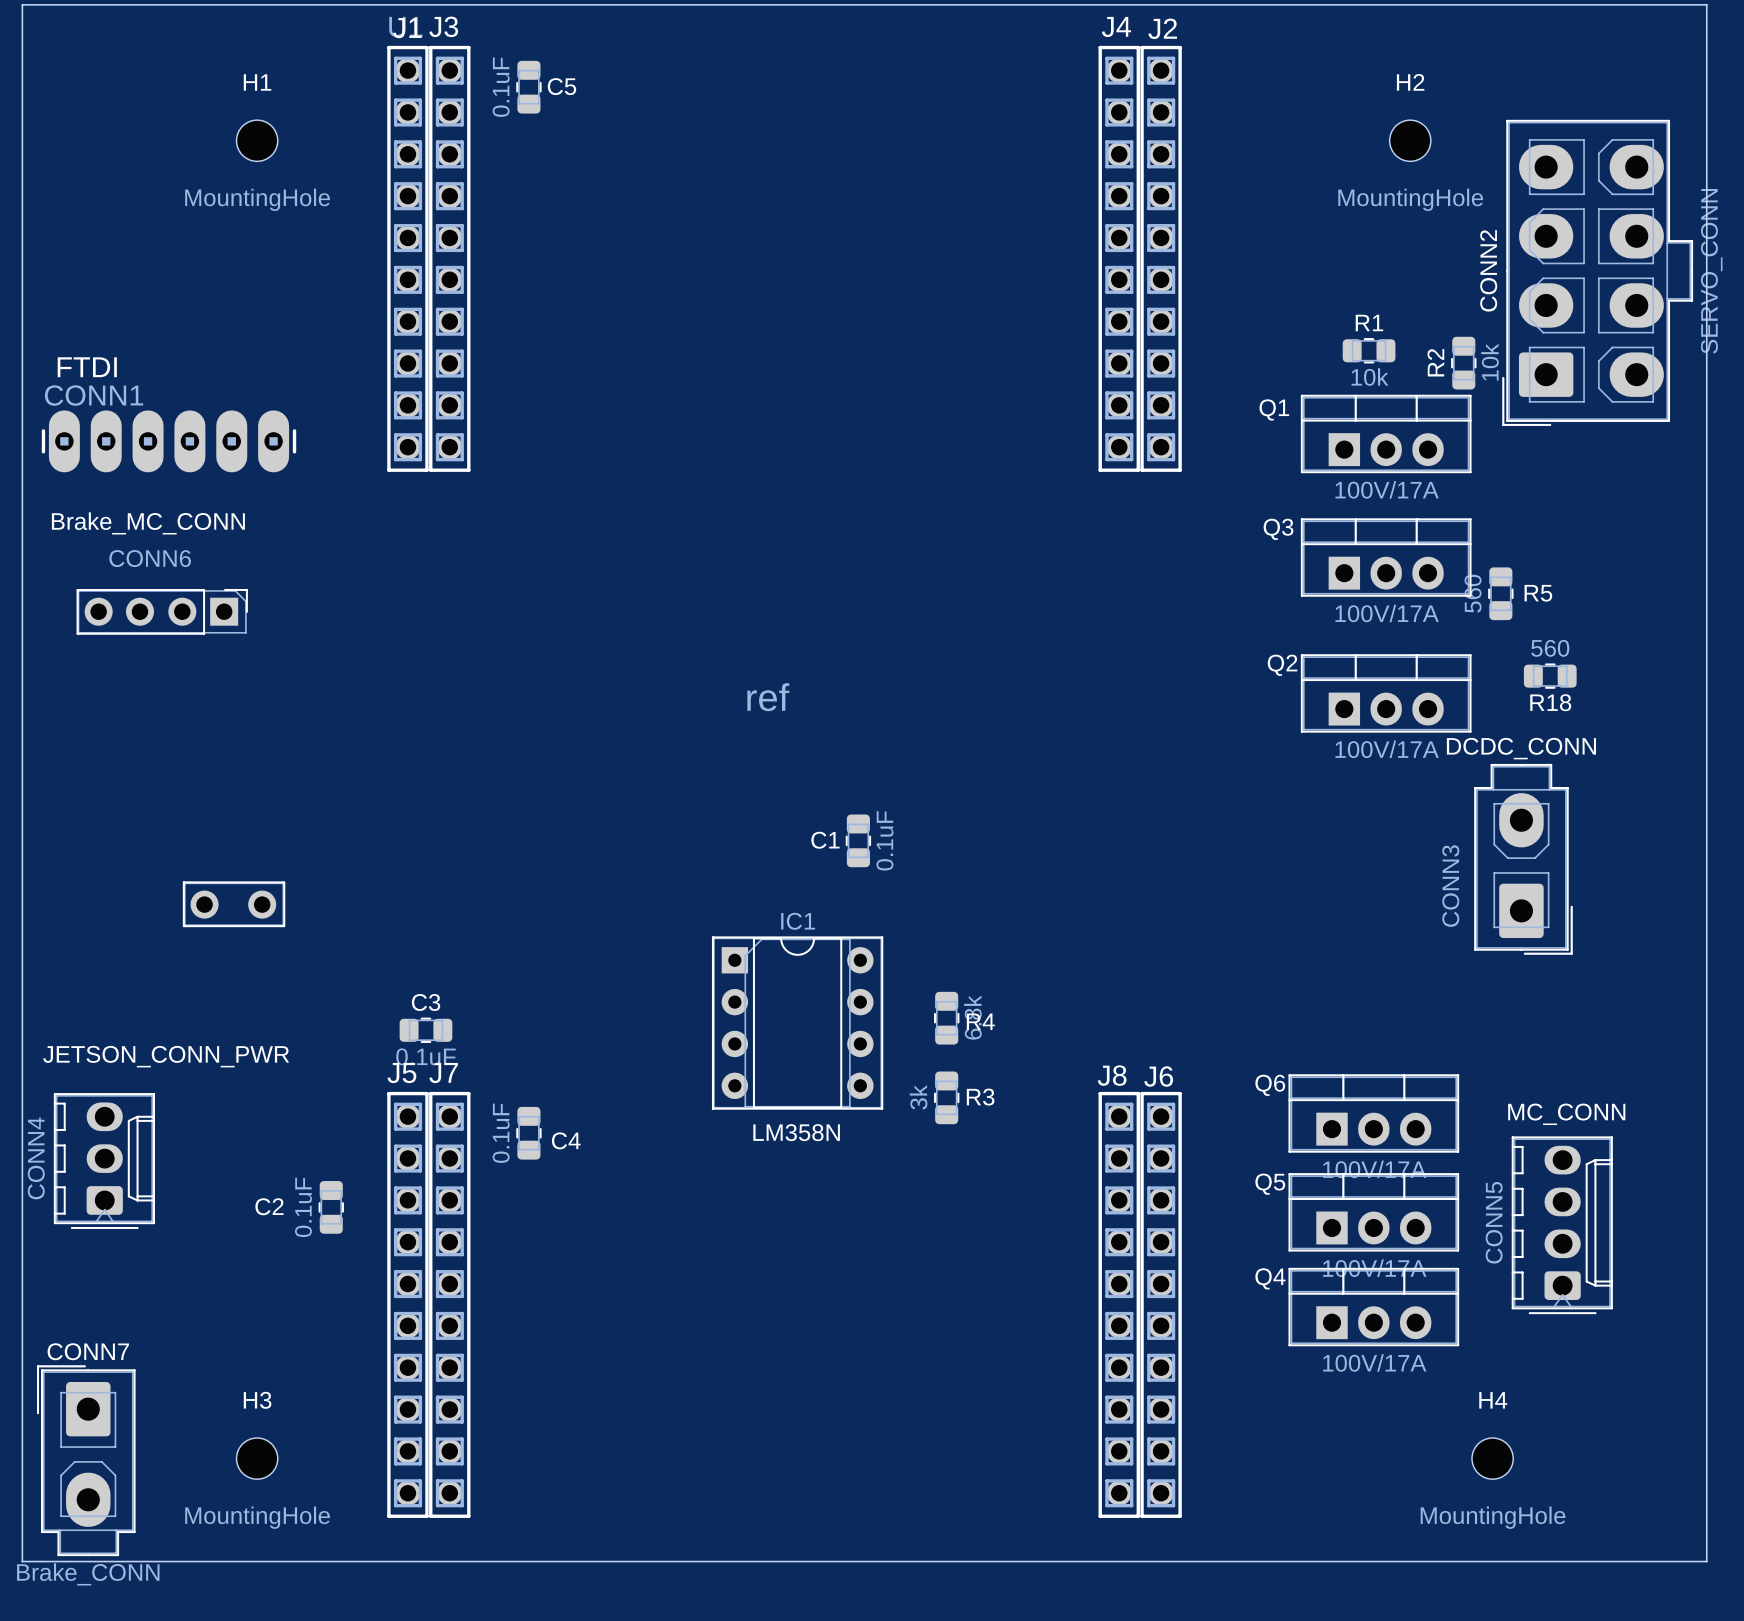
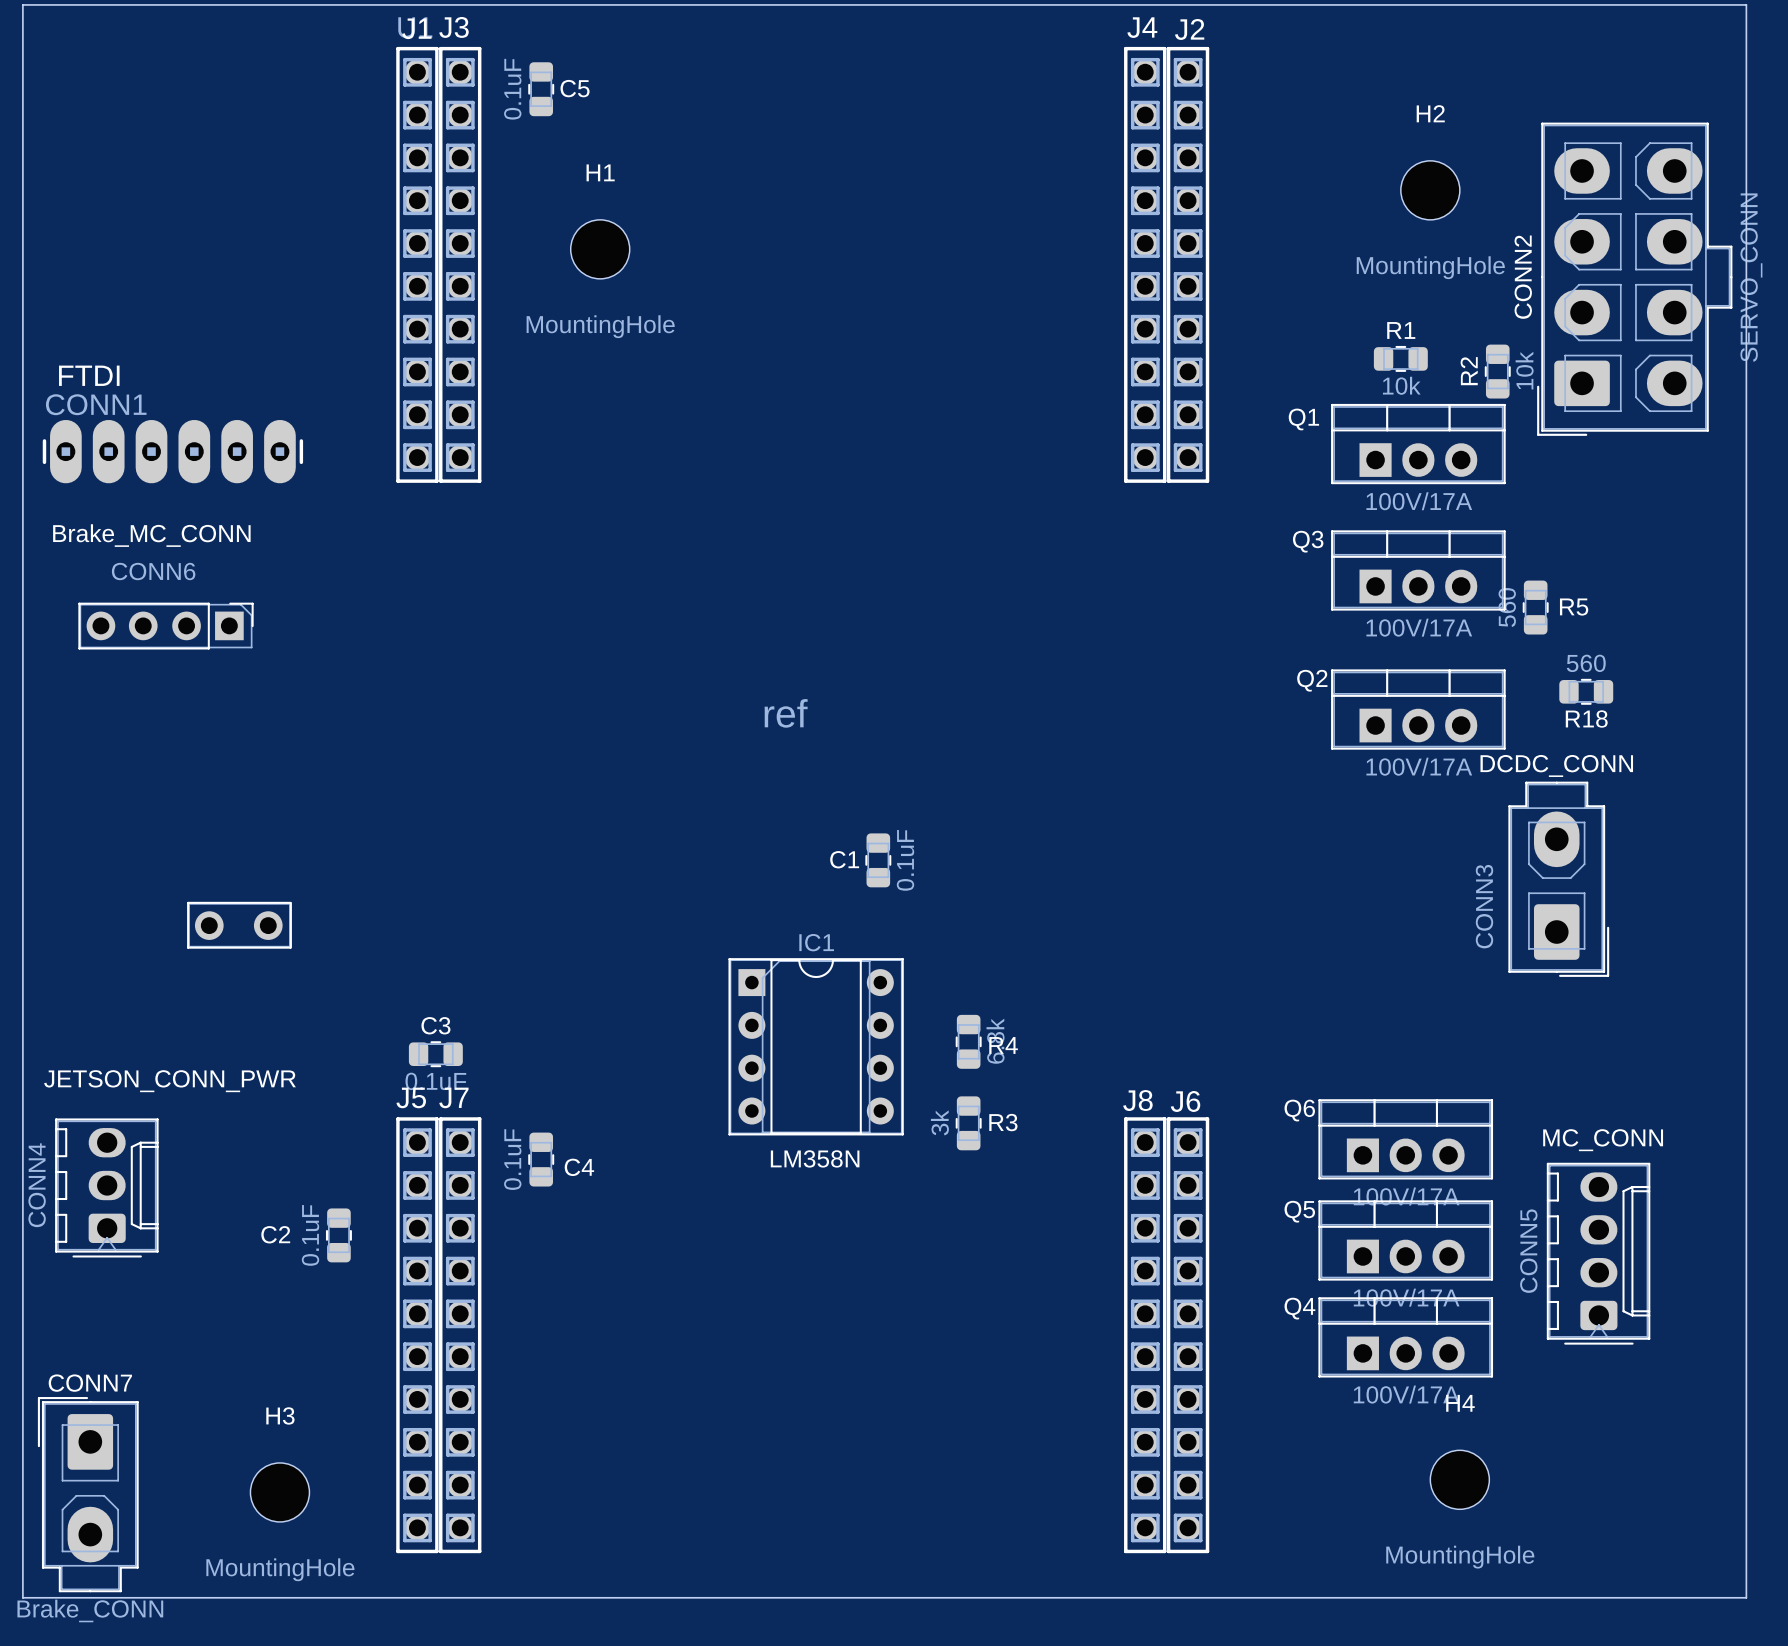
H1 footprint: [236, 120, 278, 162] -> [570, 219, 630, 279]
H2 footprint: [1389, 120, 1431, 162] -> [1400, 160, 1460, 220]
H3 footprint: [236, 1438, 278, 1480] -> [250, 1462, 310, 1522]
H4 footprint: [1472, 1438, 1514, 1480] -> [1430, 1450, 1490, 1510]

